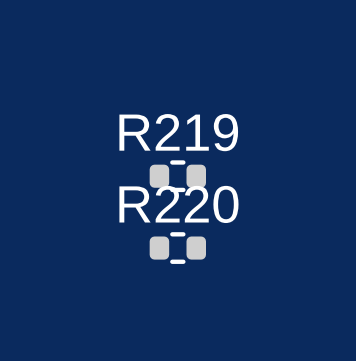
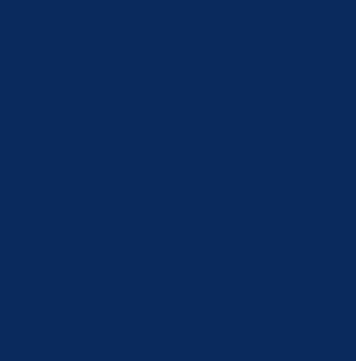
R219: (177, 176) -> none
R220: (177, 248) -> none

